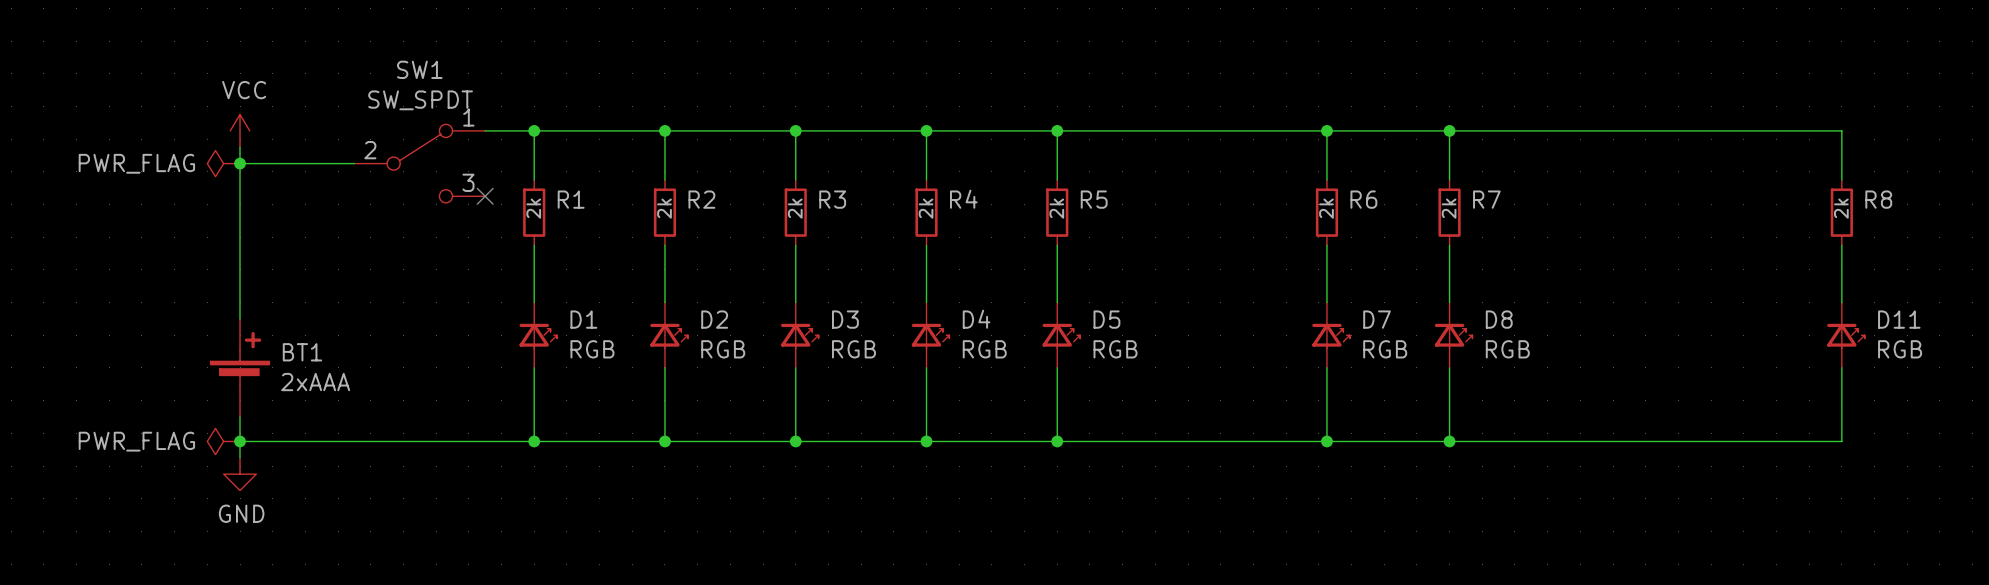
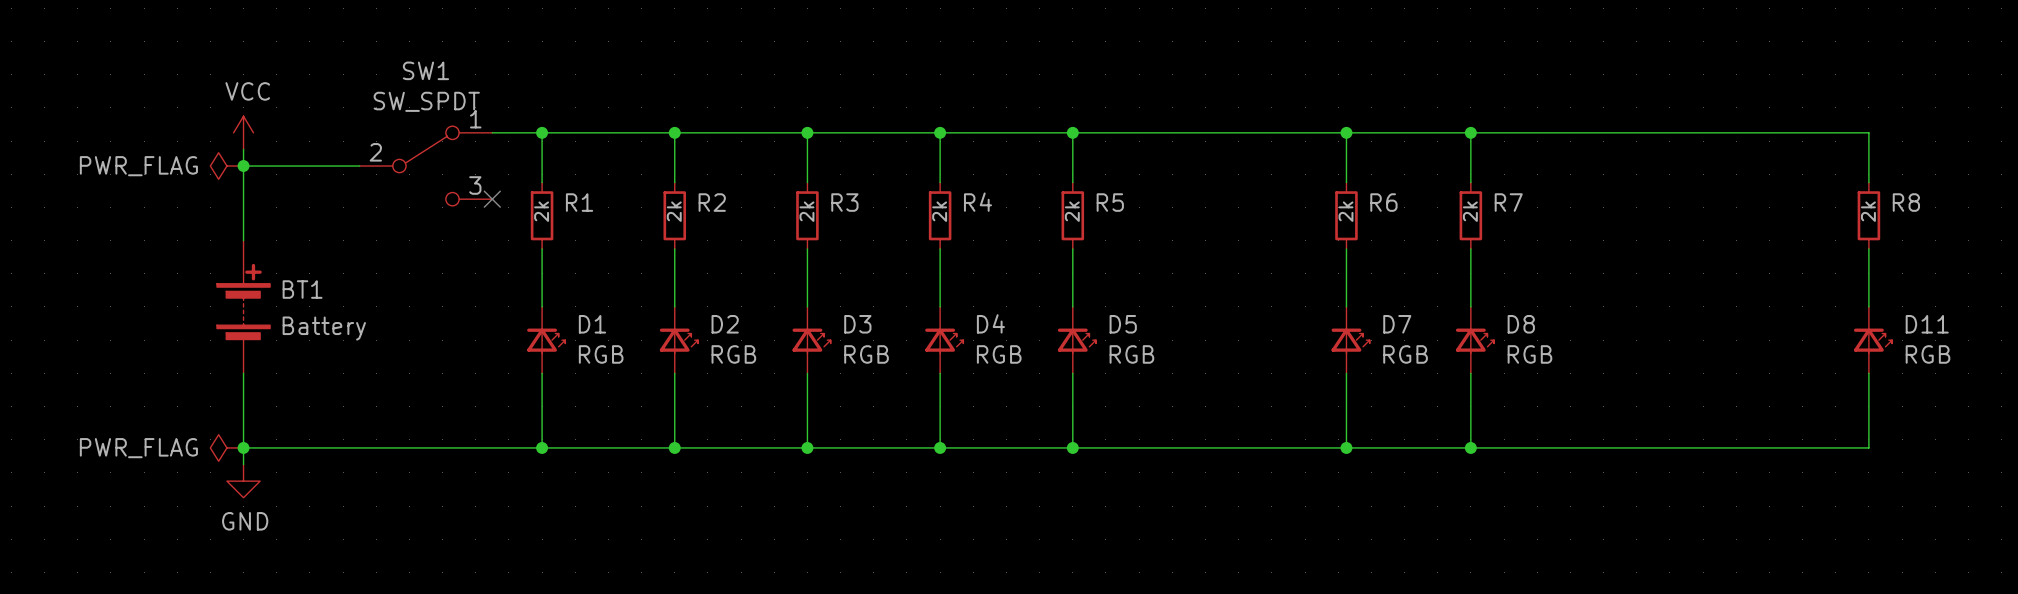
BT1 symbol: [210, 318, 270, 417] -> [216, 240, 271, 374]
BT1 value: 2xAAA (315, 382) -> Battery (324, 328)

